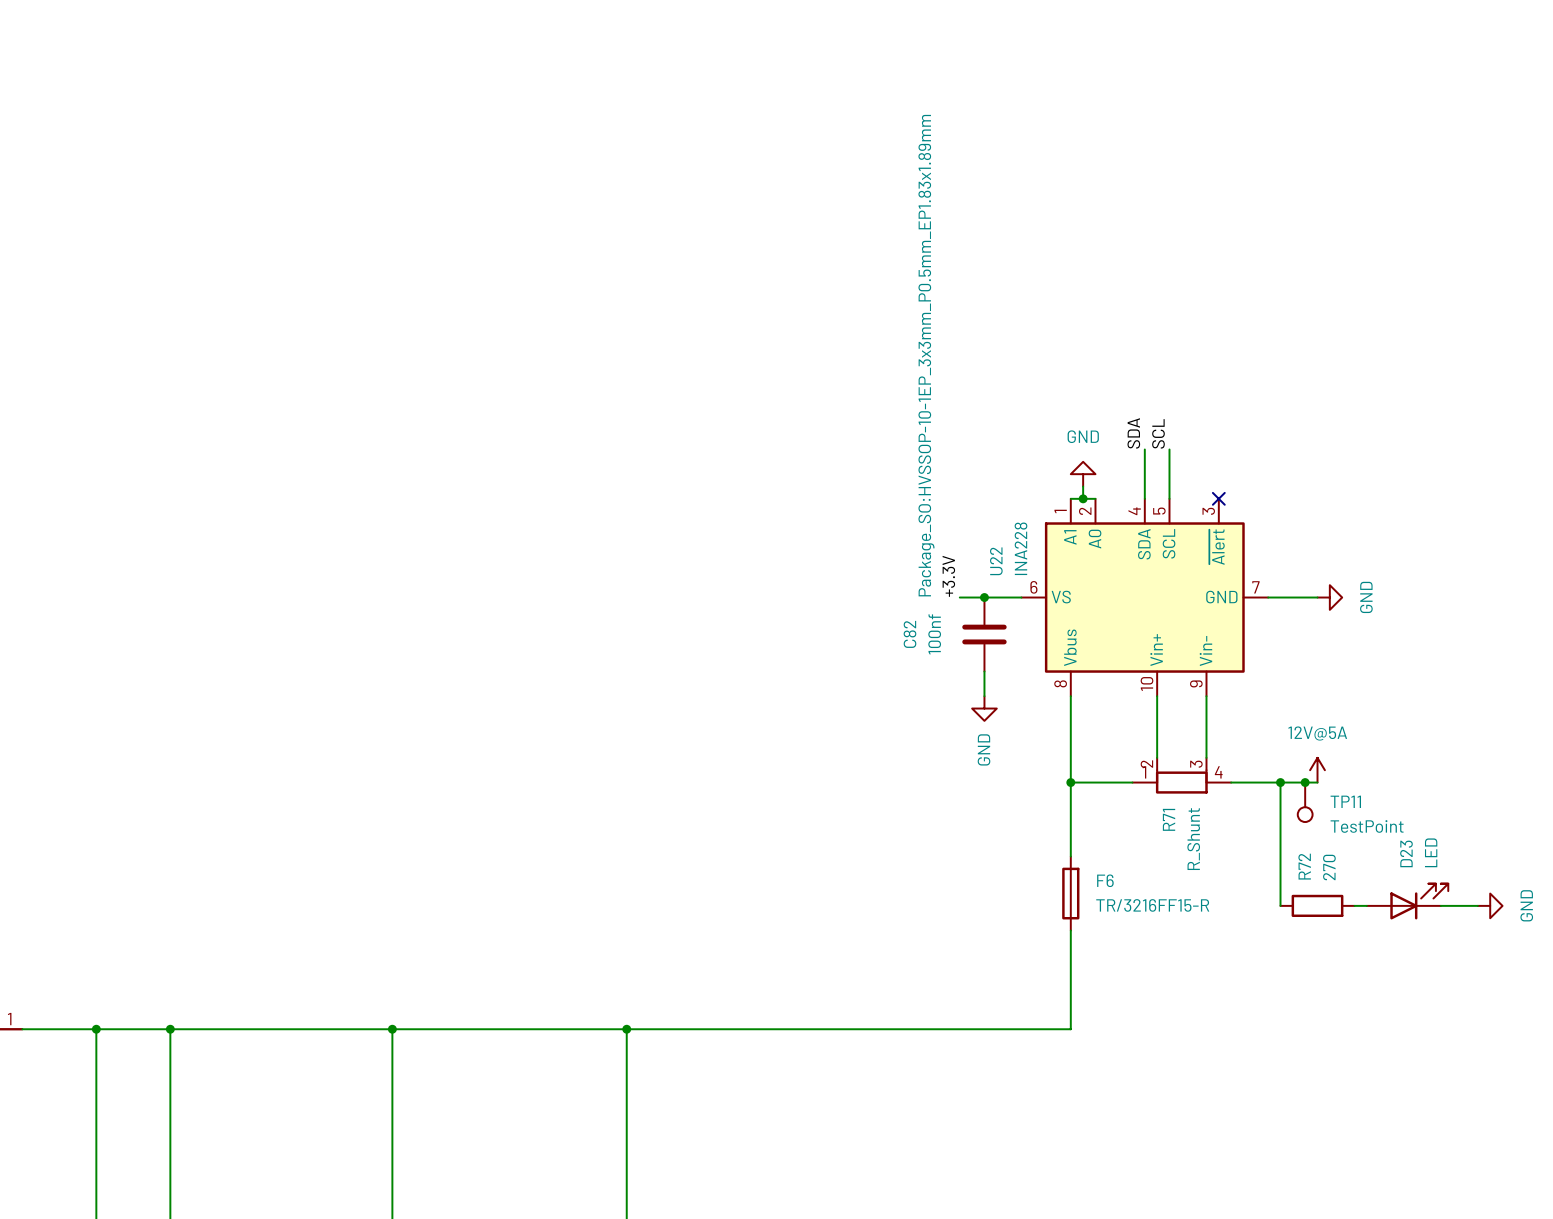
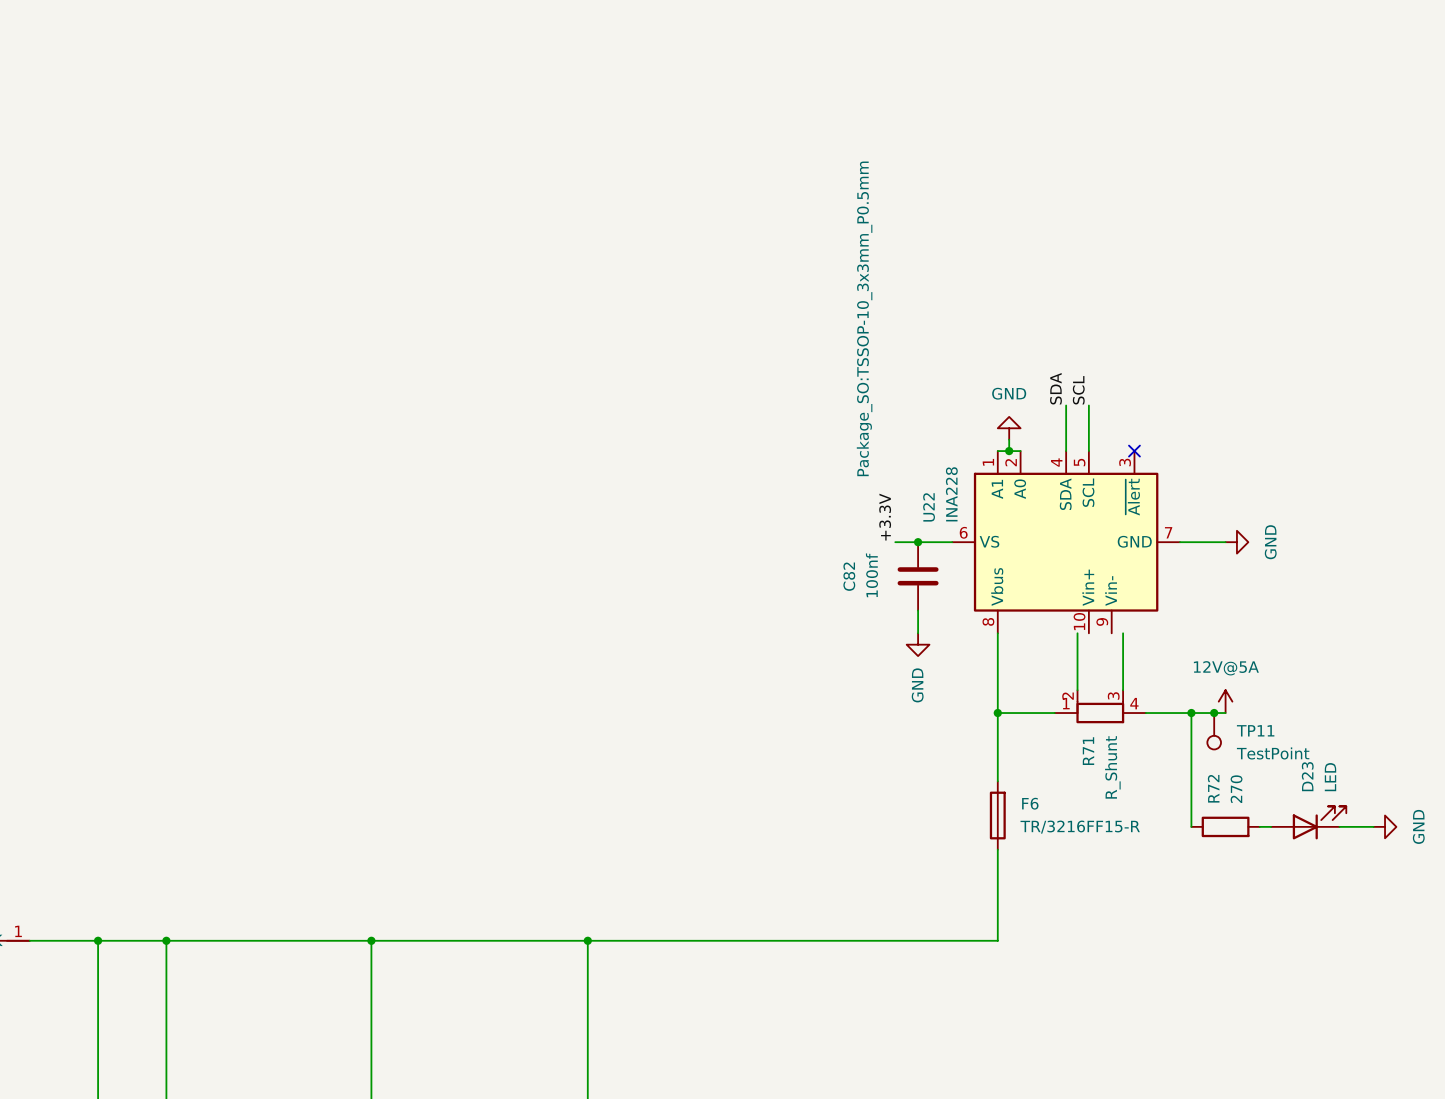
U22 text: Package_SO:HVSSOP-10-1EP_3x3mm_P0.5mm_EP1.83x1.89mm (926, 355) -> Package_SO:TSSOP-10_3x3mm_P0.5mm (864, 318)
U22 symbol: [1021, 498, 1269, 697] -> [952, 451, 1181, 634]

